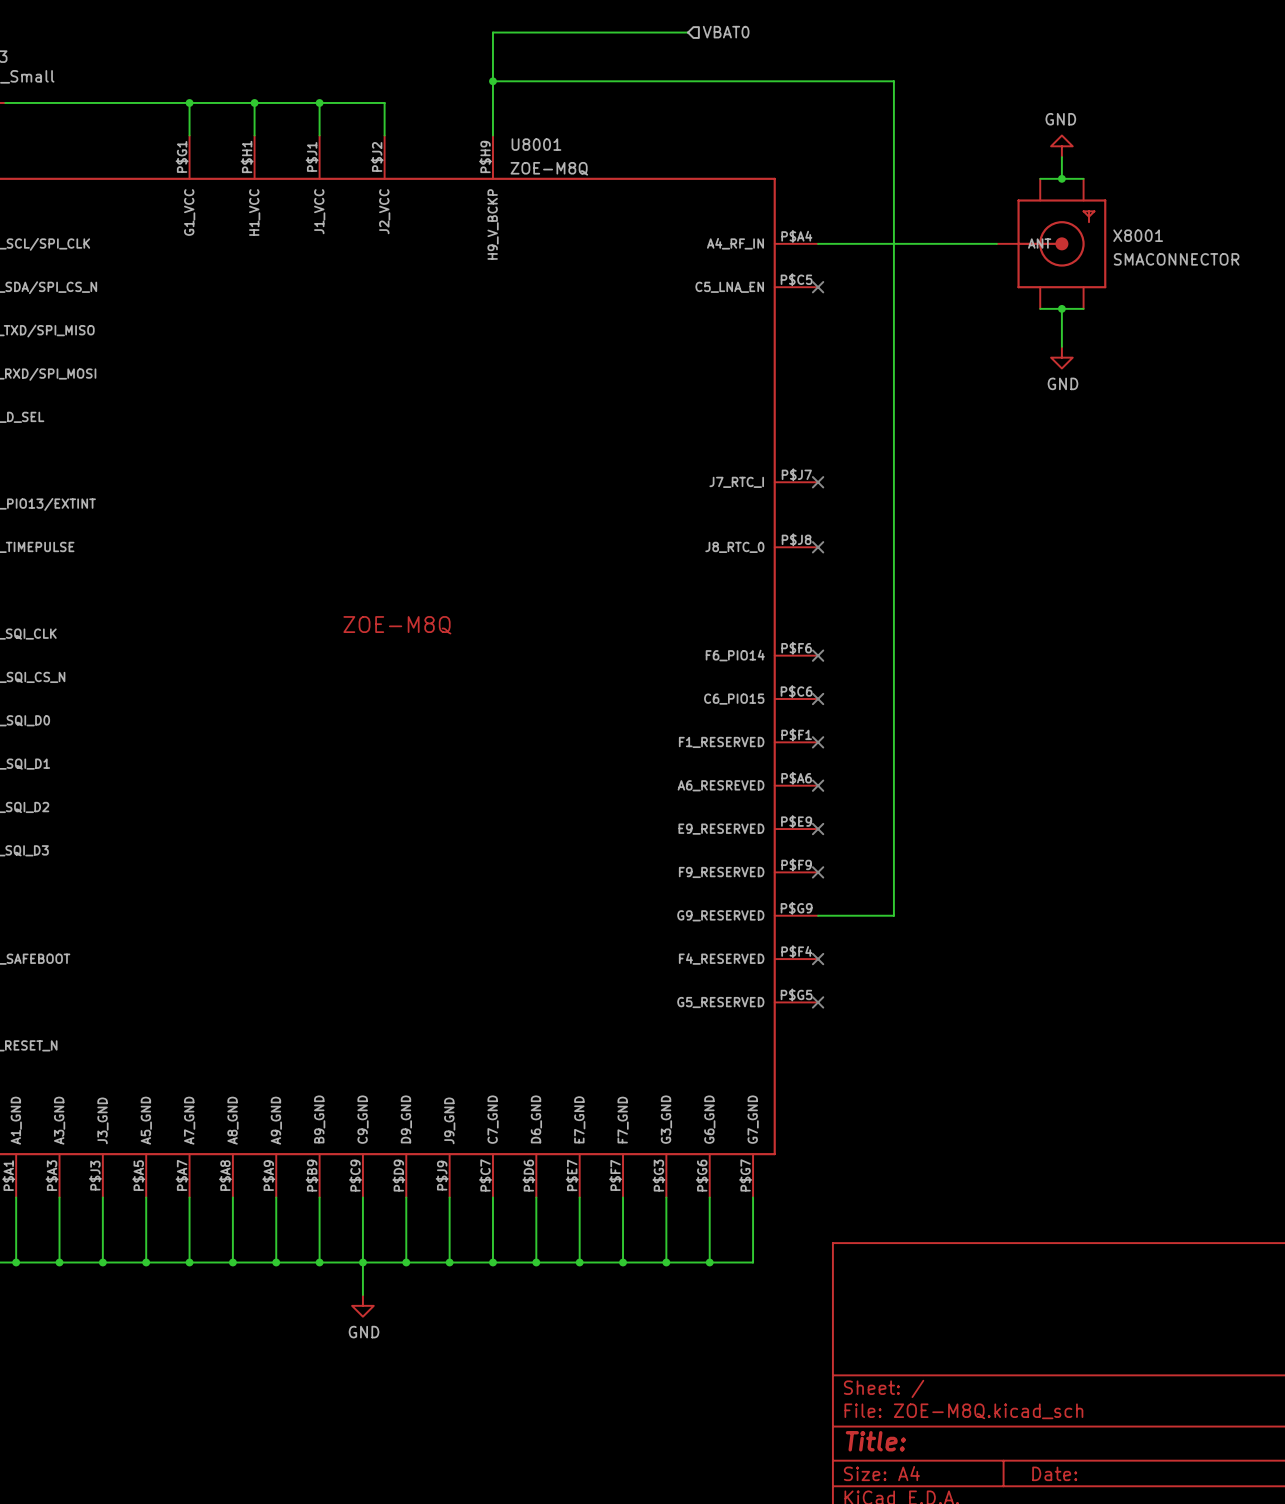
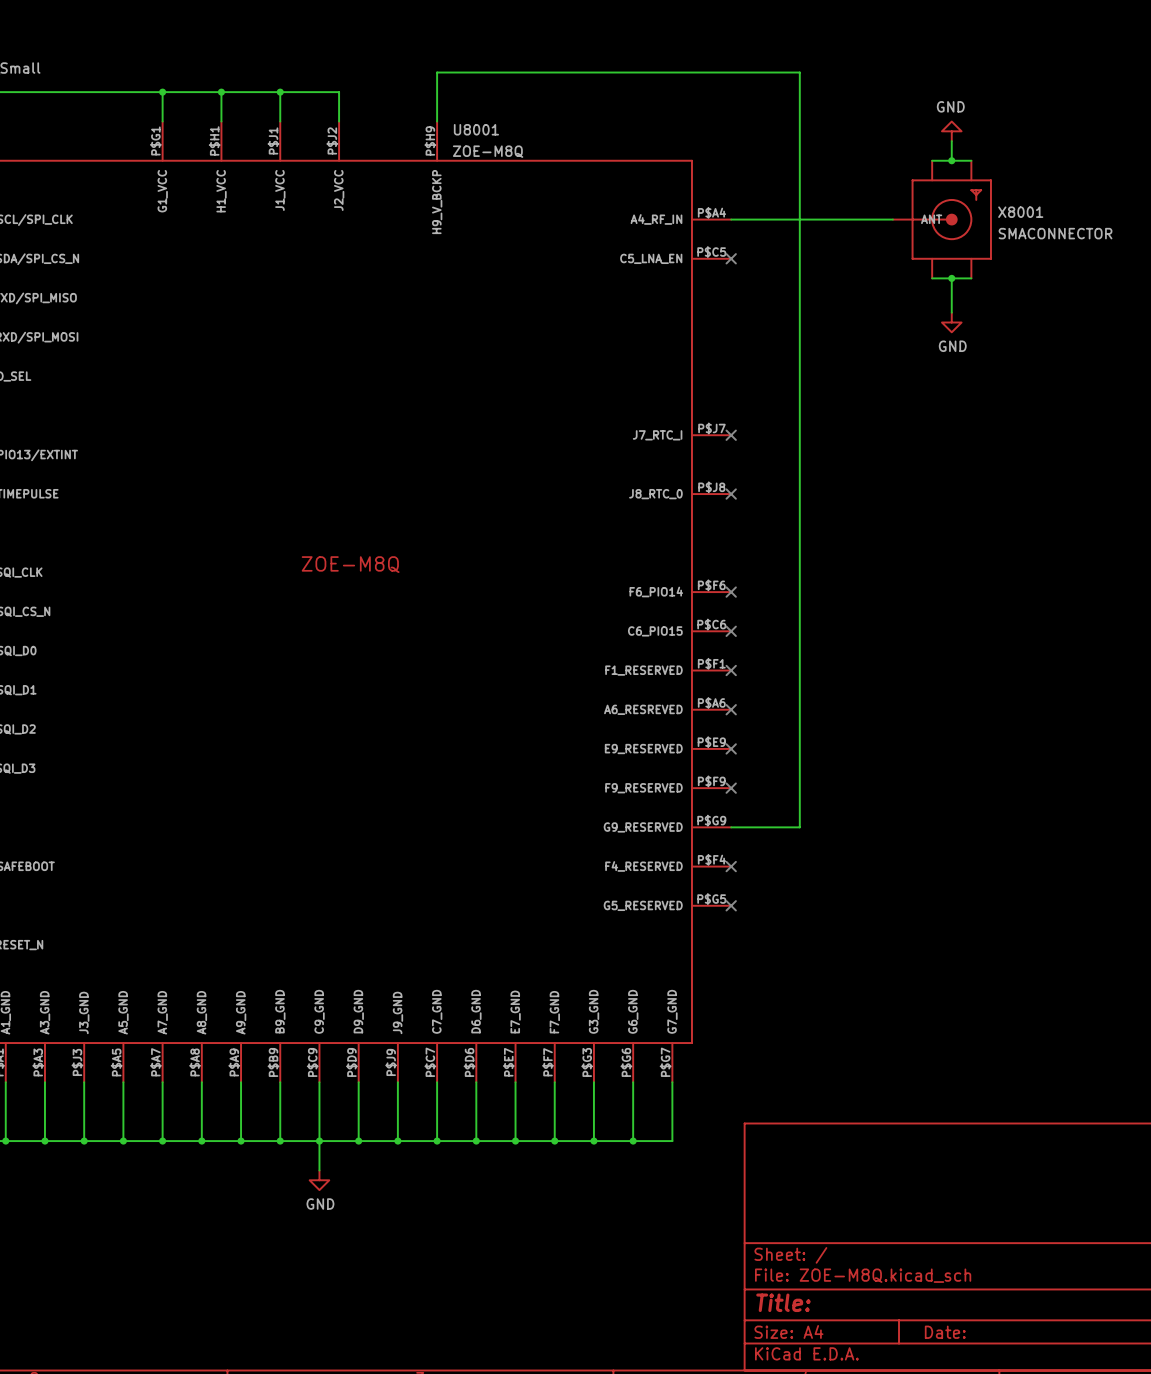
wire: (688, 32) (492, 32) (492, 81) -> none
hierarchical label: VBAT0 (726, 32) -> none
junction: (492, 81) -> none

